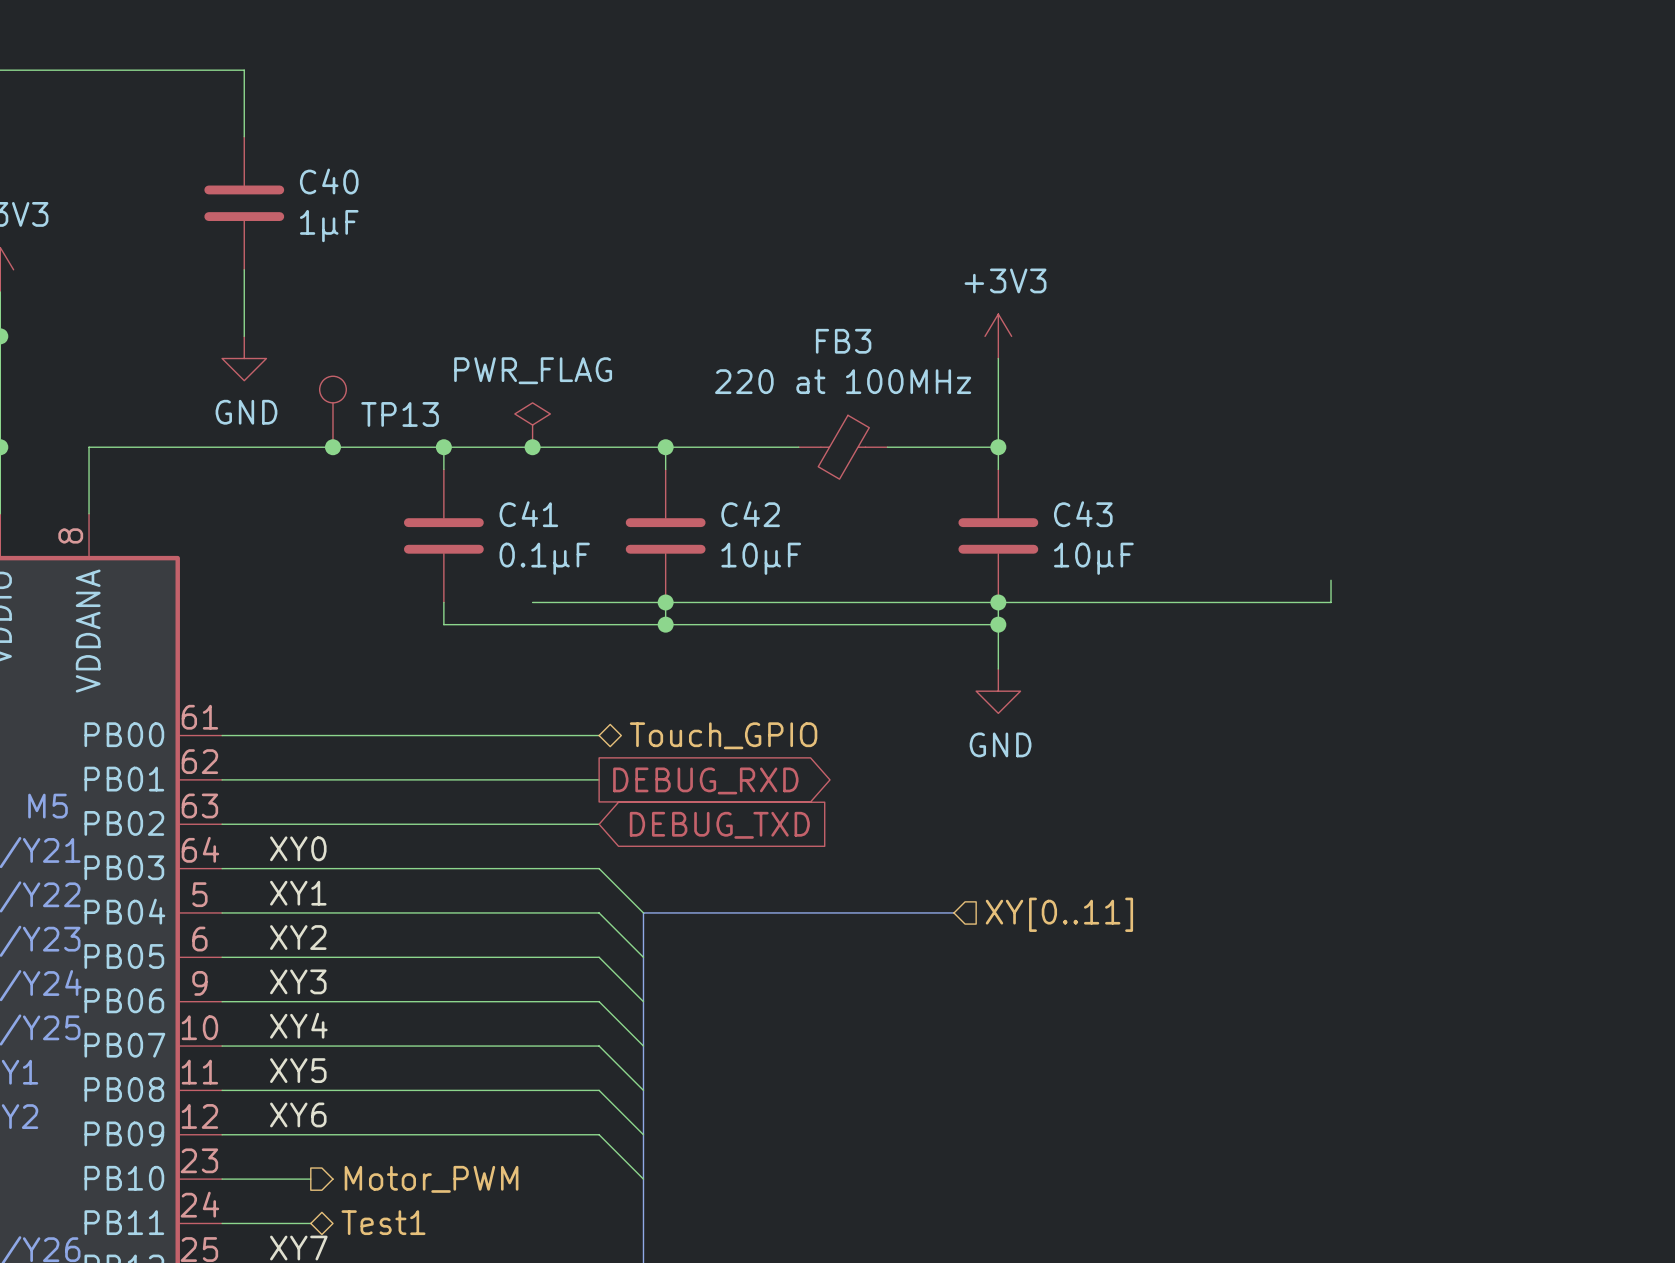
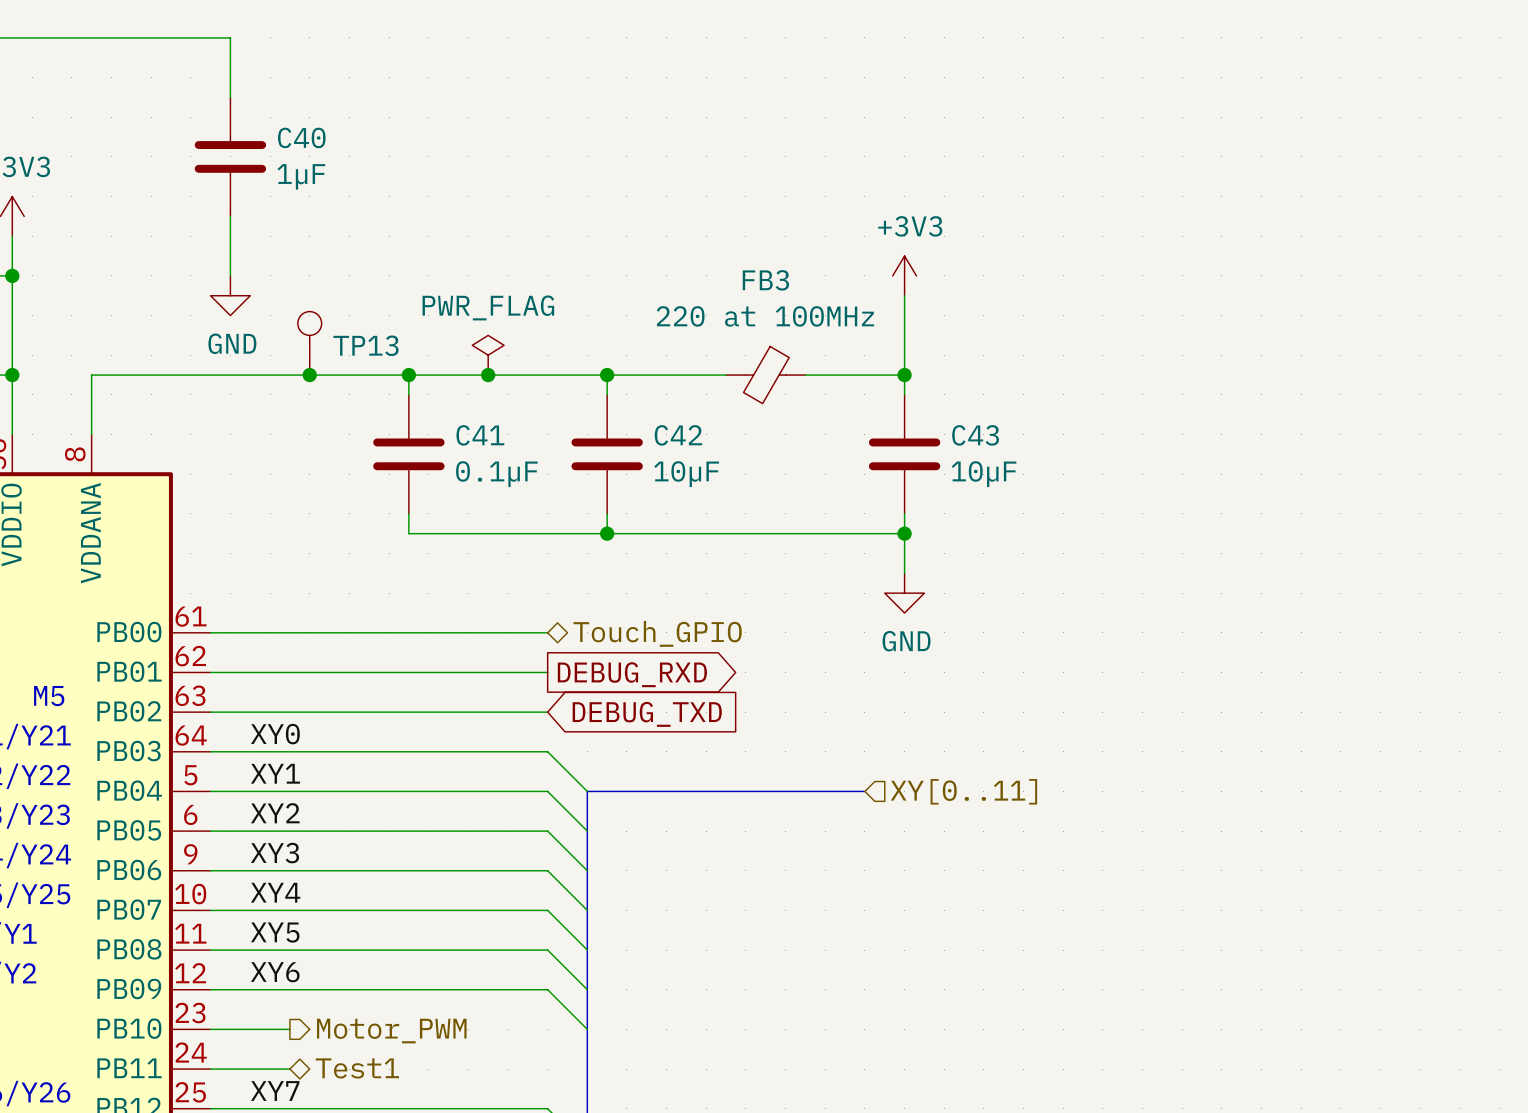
wire: (1331, 580) (1331, 602) (532, 602) -> none
junction: (665, 602) -> none
junction: (998, 602) -> none

